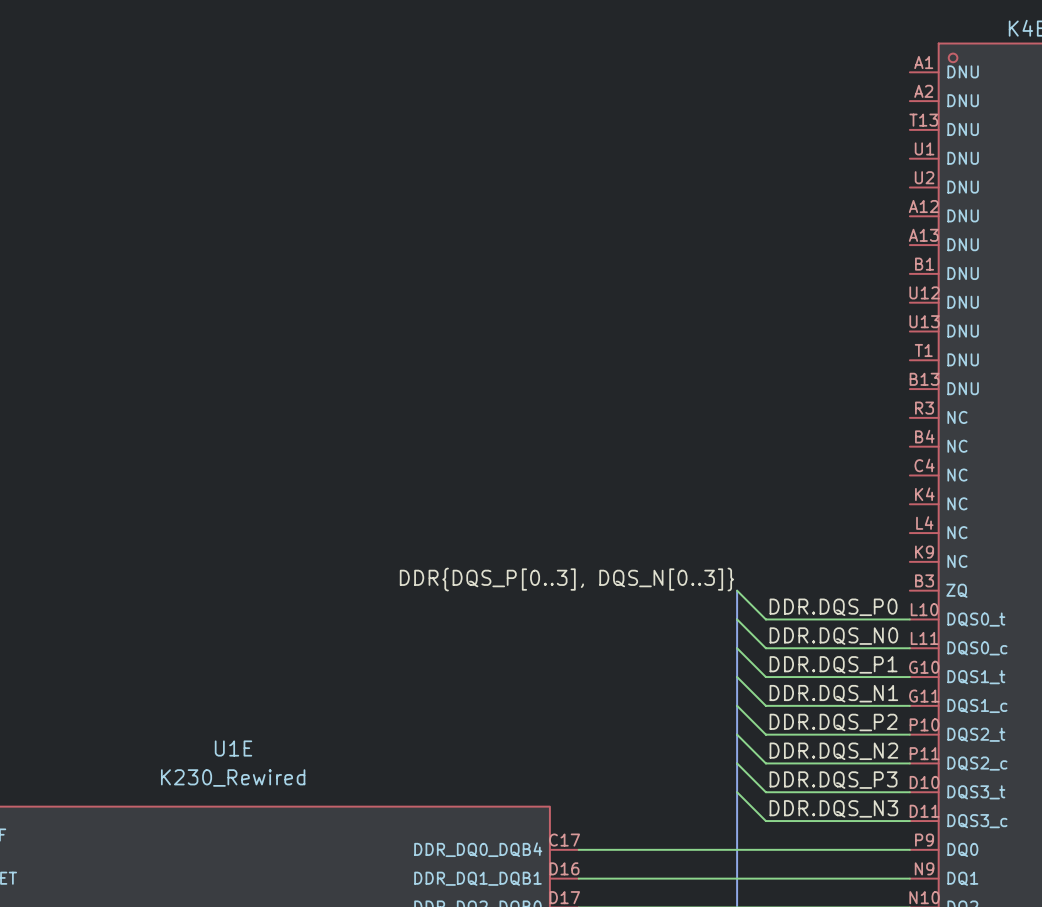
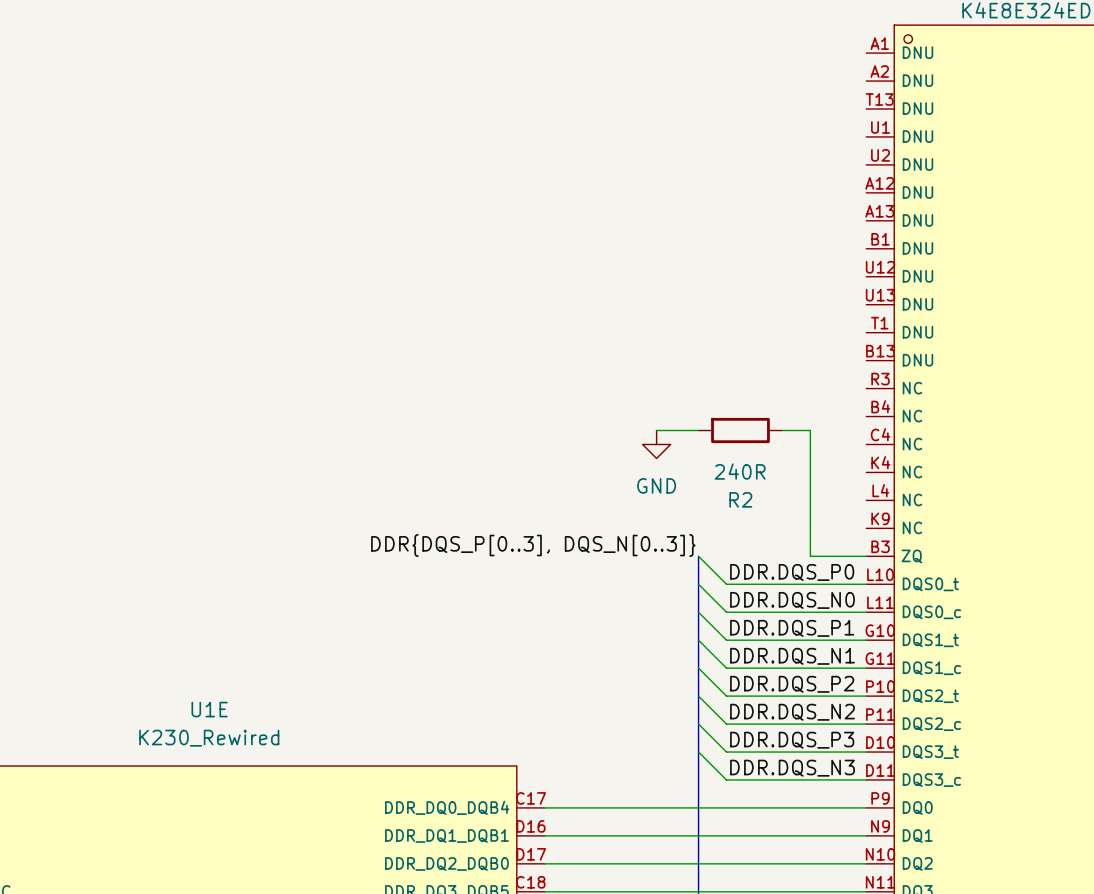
wire: none -> (656, 430) (698, 430)
R2: none -> 240R (740, 430)
wire: none -> (782, 430) (810, 430) (810, 556) (866, 556)
power symbol: none -> GND (656, 444)

